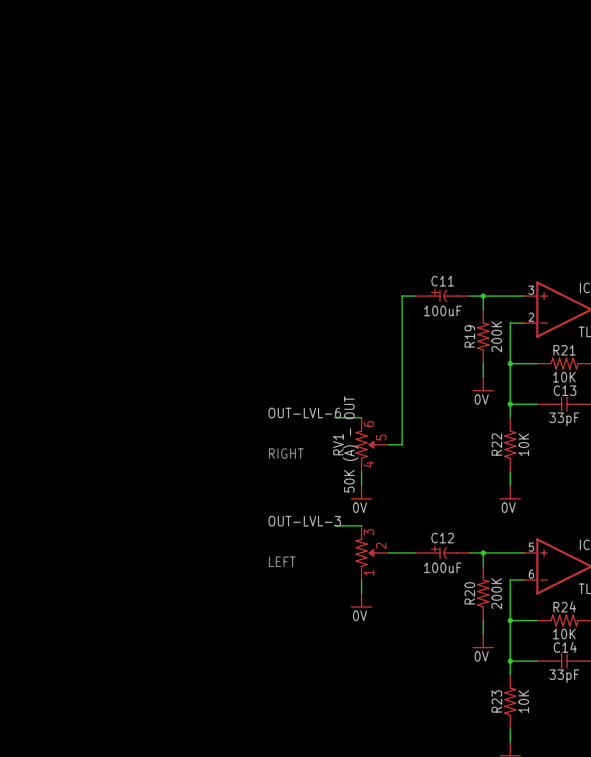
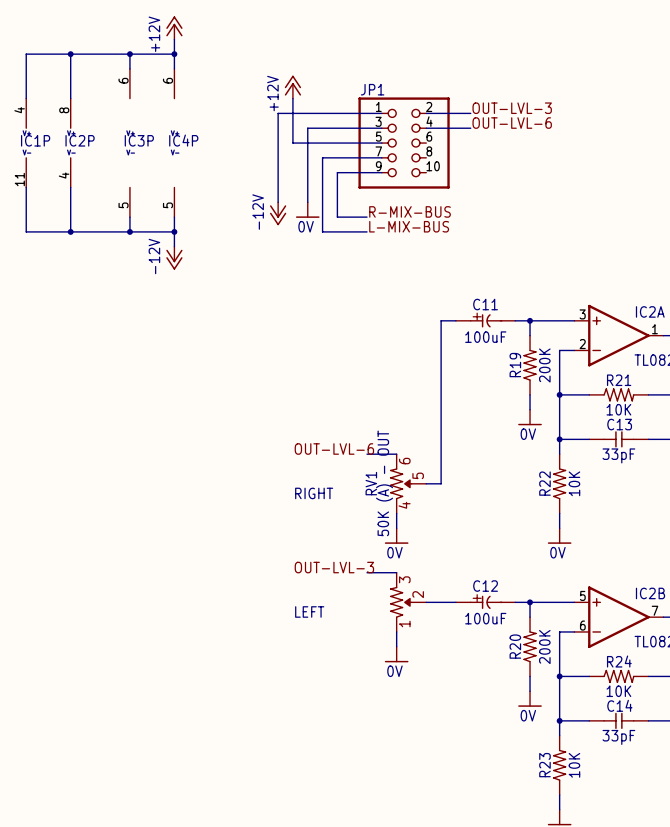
power symbol: none -> +12V (174, 27)
wire: none -> (174, 39) (174, 68)
wire: none -> (70, 54) (70, 98)
junction: none -> (70, 54)
wire: none -> (129, 54) (129, 68)
junction: none -> (129, 54)
wire: none -> (174, 54) (26, 54) (26, 98)
junction: none -> (174, 54)
power symbol: none -> +12V (292, 87)
wire: none -> (292, 98) (292, 143) (381, 143)
label: none -> OUT-LVL-3 (512, 108)
wire: none -> (381, 113) (278, 113) (278, 202)
wire: none -> (426, 113) (470, 113)
label: none -> OUT-LVL-6 (512, 123)
wire: none -> (381, 128) (307, 128) (307, 202)
wire: none -> (426, 128) (470, 128)
IC1P: none -> (26, 143)
IC2P: none -> (70, 143)
IC3P: none -> (129, 143)
IC4P: none -> (174, 143)
JP1: none -> (404, 143)
wire: none -> (381, 157) (322, 157) (322, 231) (367, 231)
wire: none -> (381, 172) (337, 172) (337, 217) (367, 217)
wire: none -> (26, 187) (26, 231) (174, 231)
wire: none -> (70, 187) (70, 231)
power symbol: none -> 0V (307, 210)
label: none -> R-MIX-BUS (410, 211)
power symbol: none -> -12V (278, 213)
wire: none -> (129, 217) (129, 231)
wire: none -> (174, 217) (174, 246)
label: none -> L-MIX-BUS (409, 226)
junction: none -> (70, 231)
junction: none -> (129, 231)
junction: none -> (174, 231)
power symbol: none -> -12V (174, 258)

